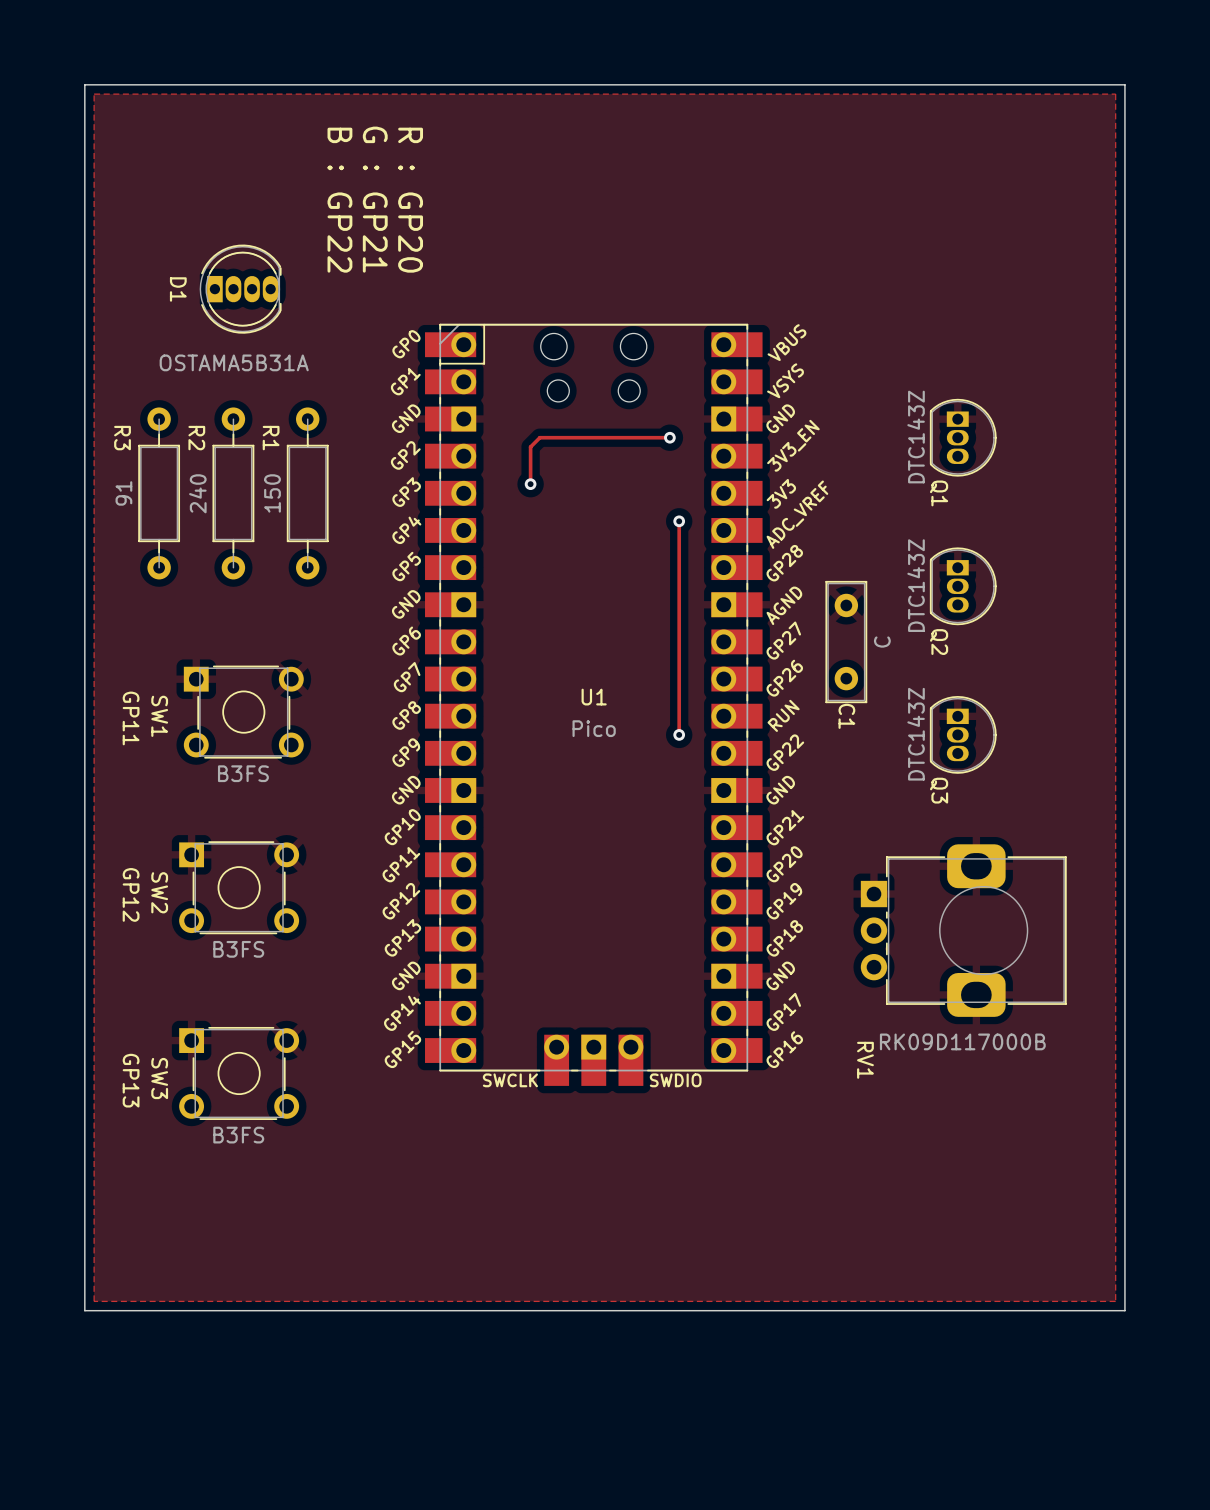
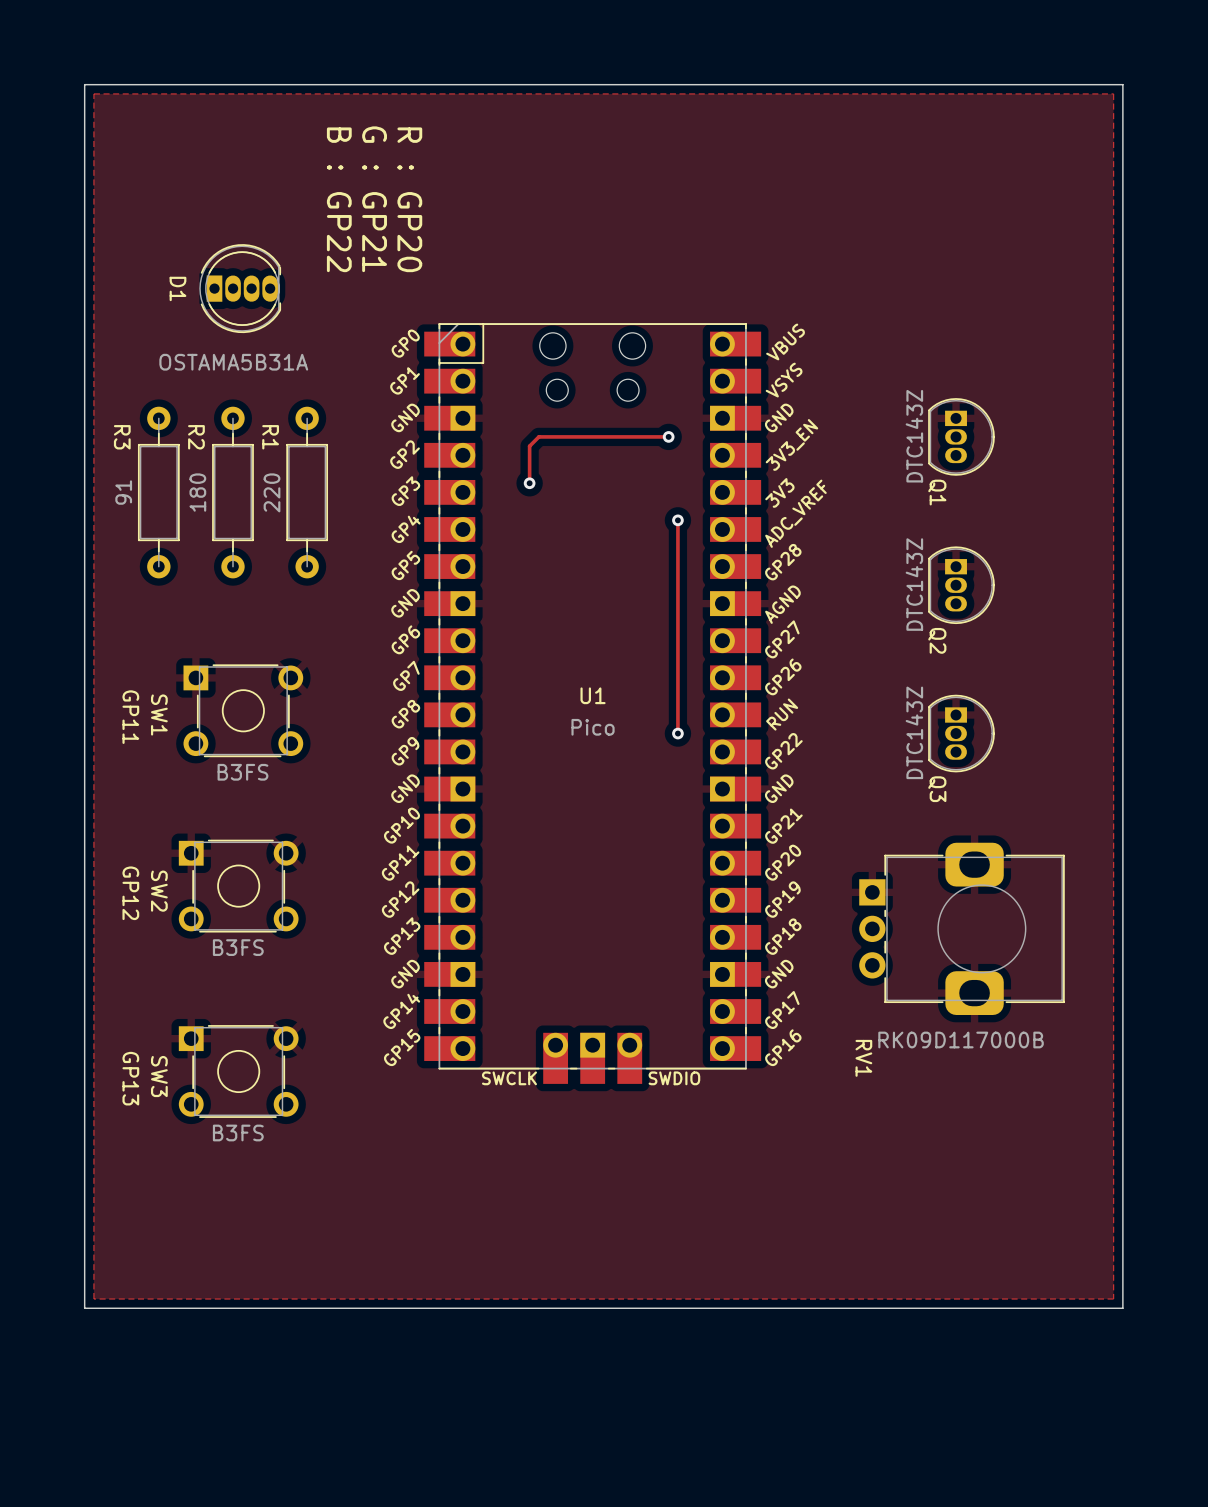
R2 value: 240 (197, 493) -> 180 (197, 492)
R1 value: 150 (272, 493) -> 220 (272, 492)
C1: C (846, 642) -> none

